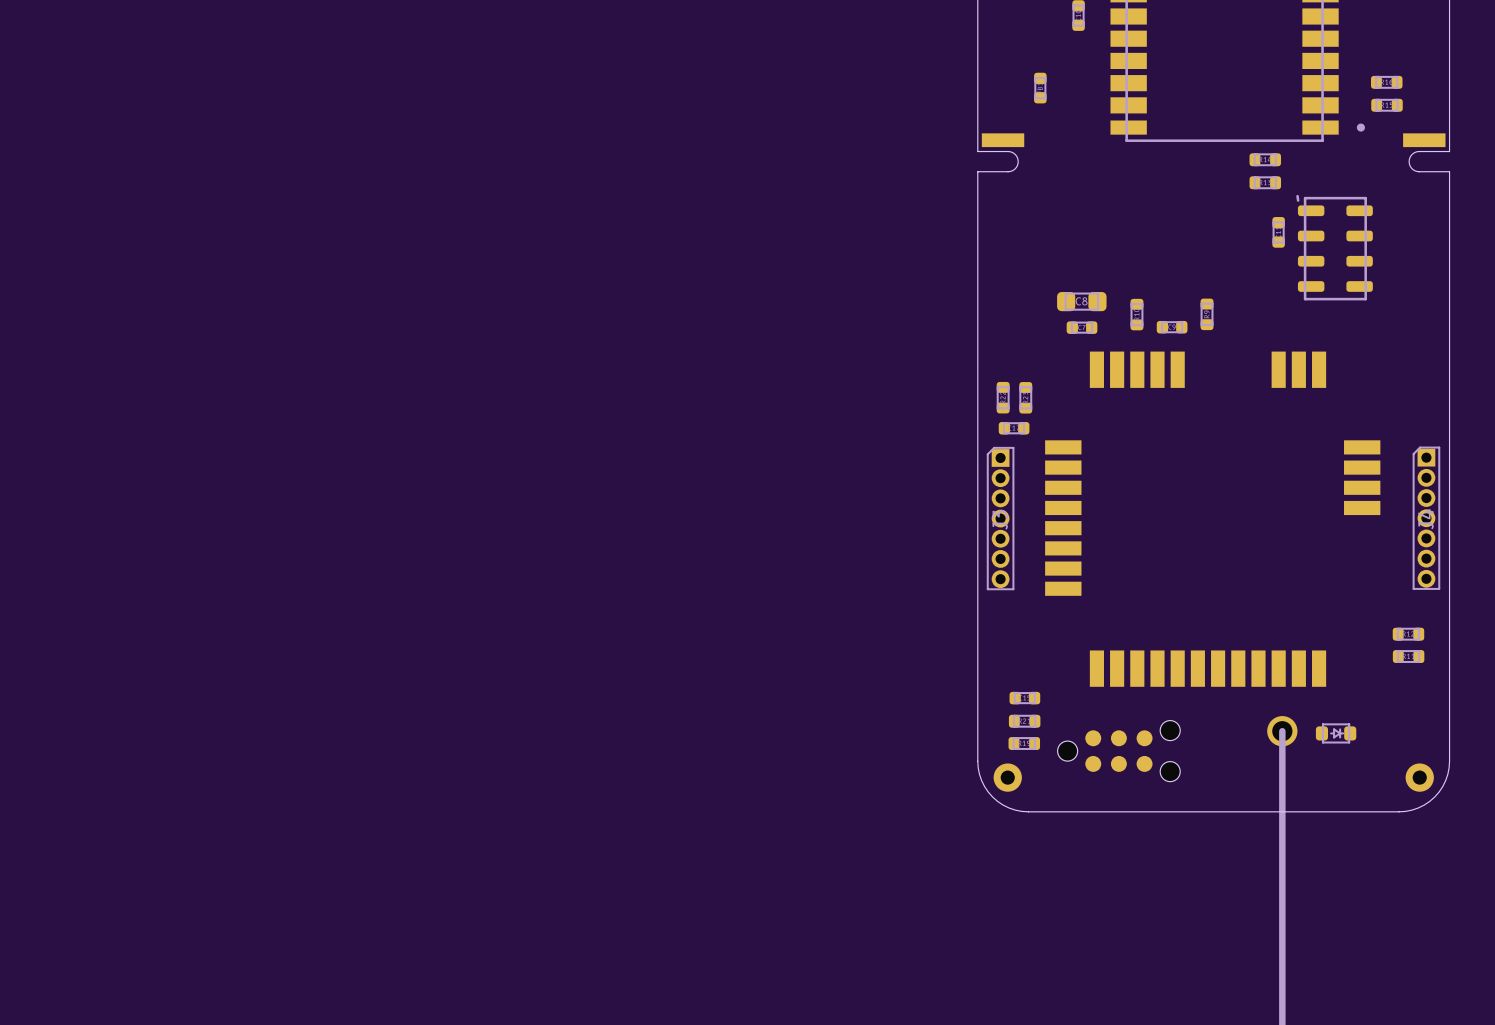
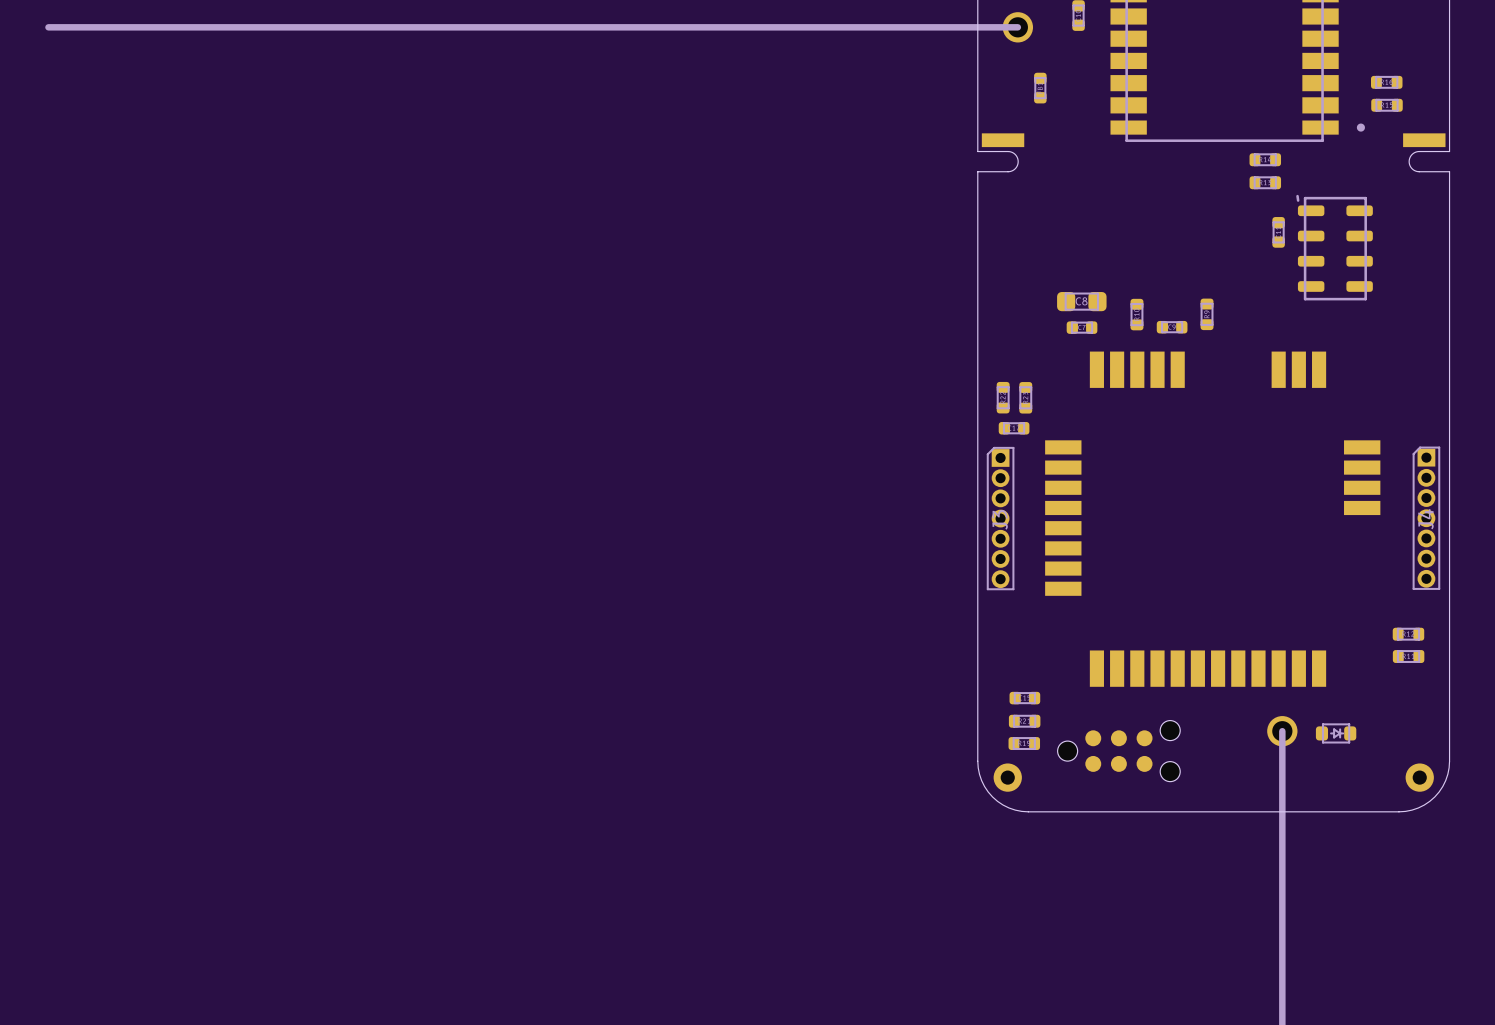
part: none -> (539, 27)

